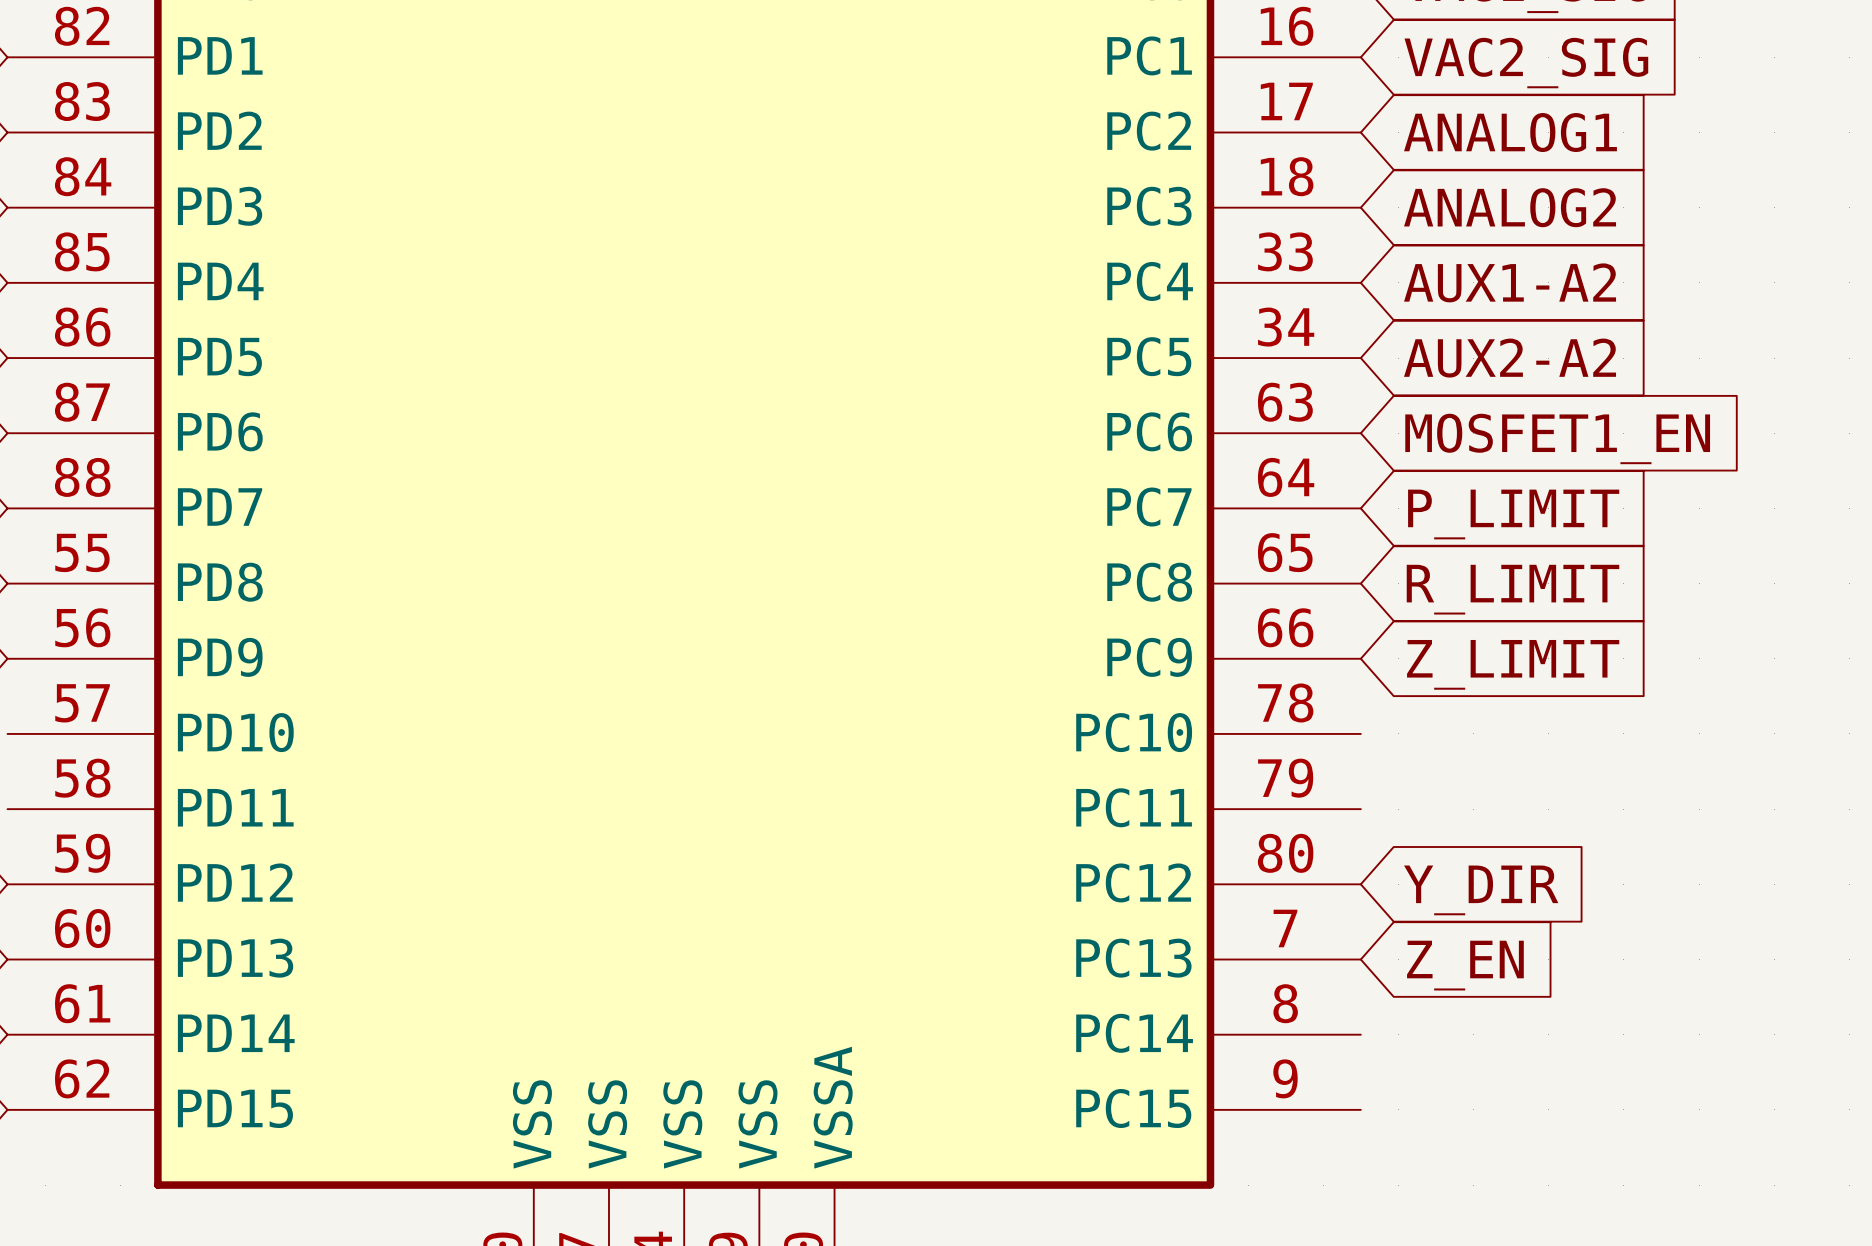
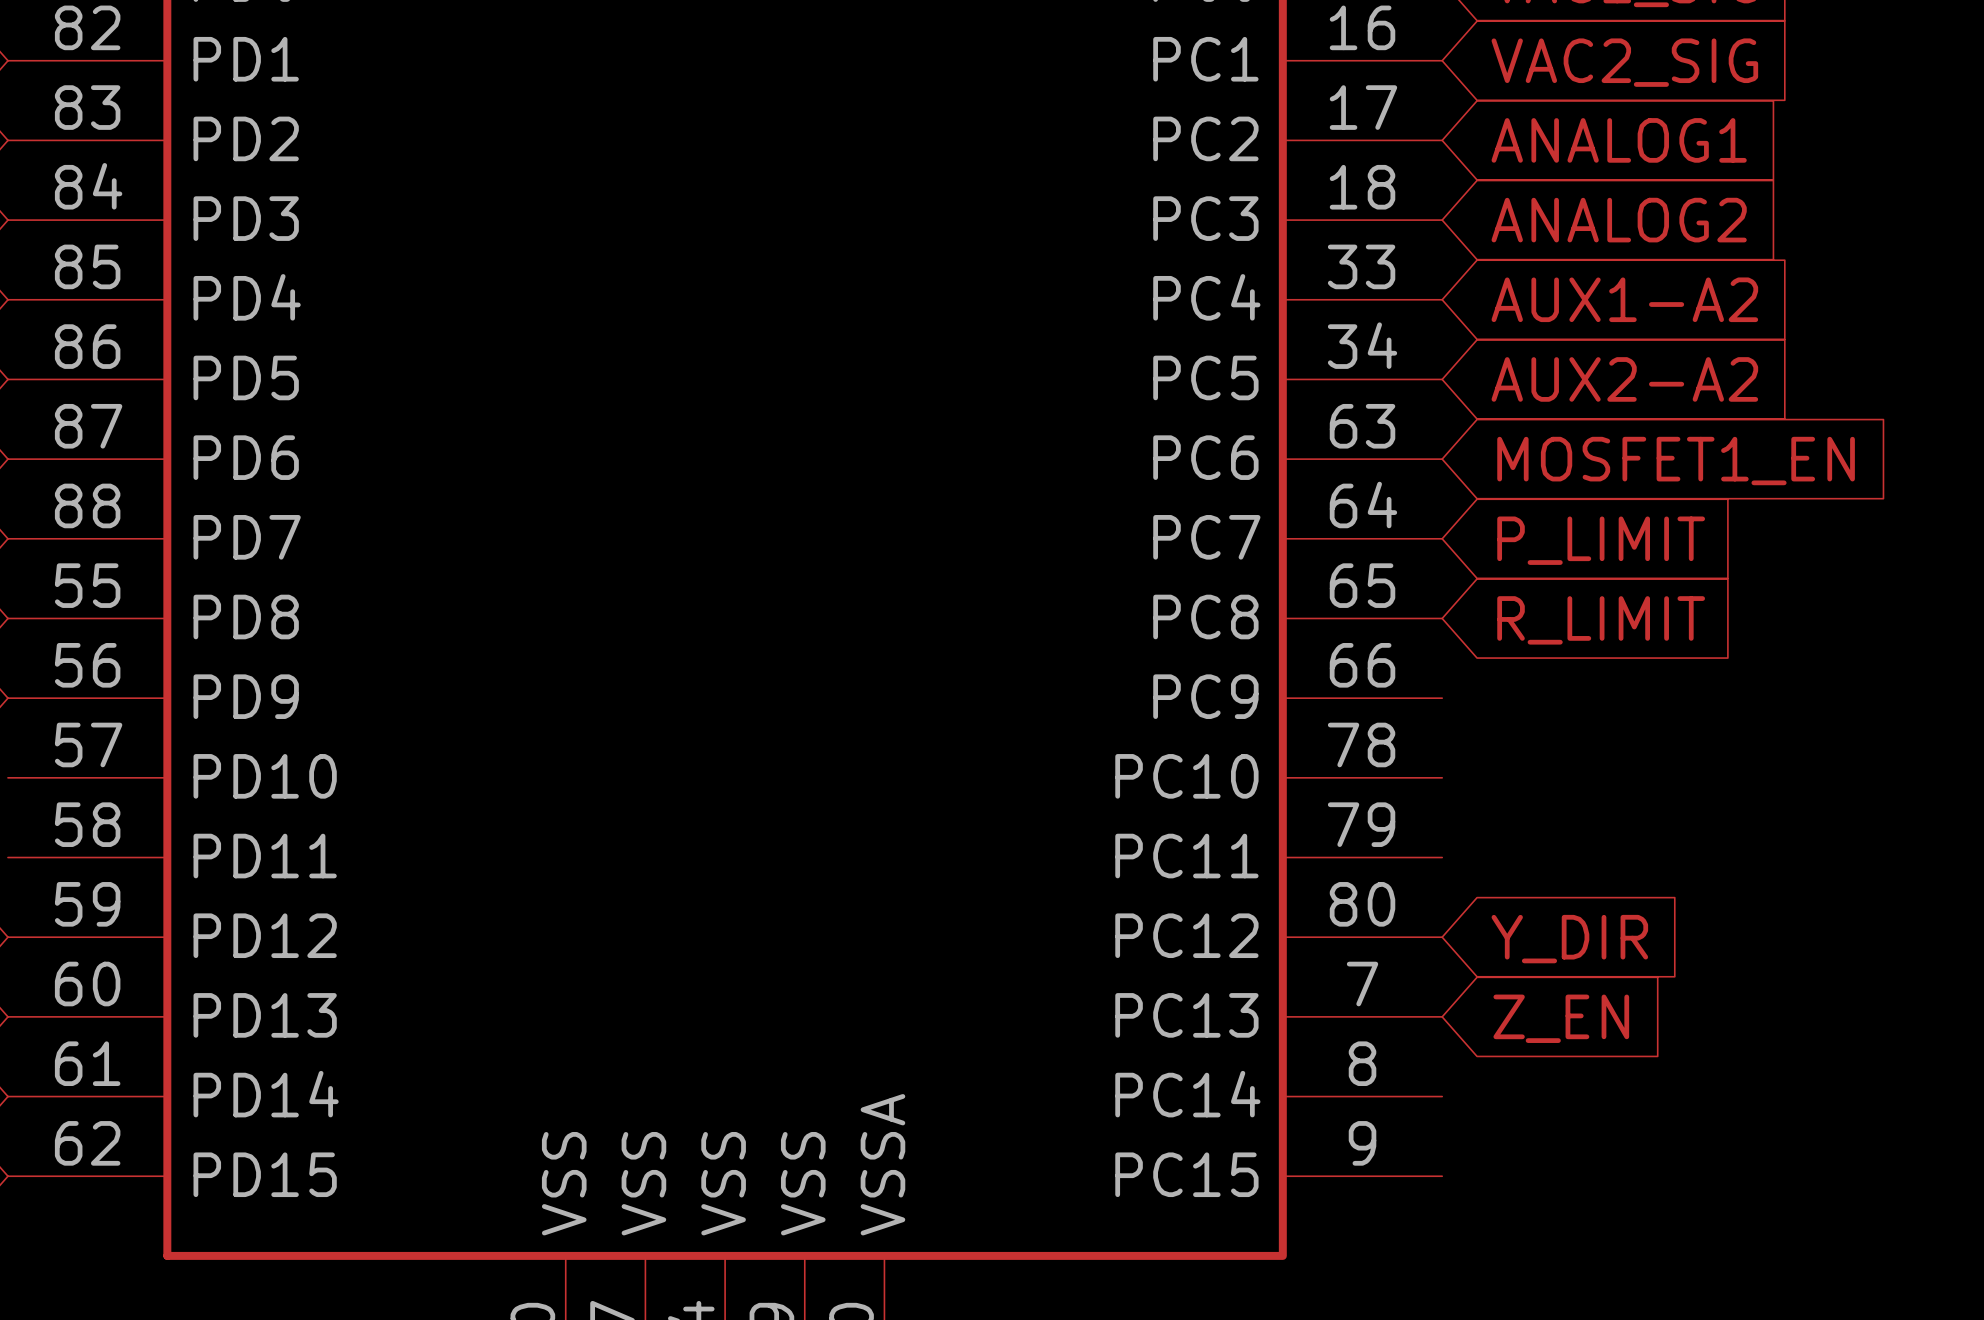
global label: Z_LIMIT (1513, 664) -> none

